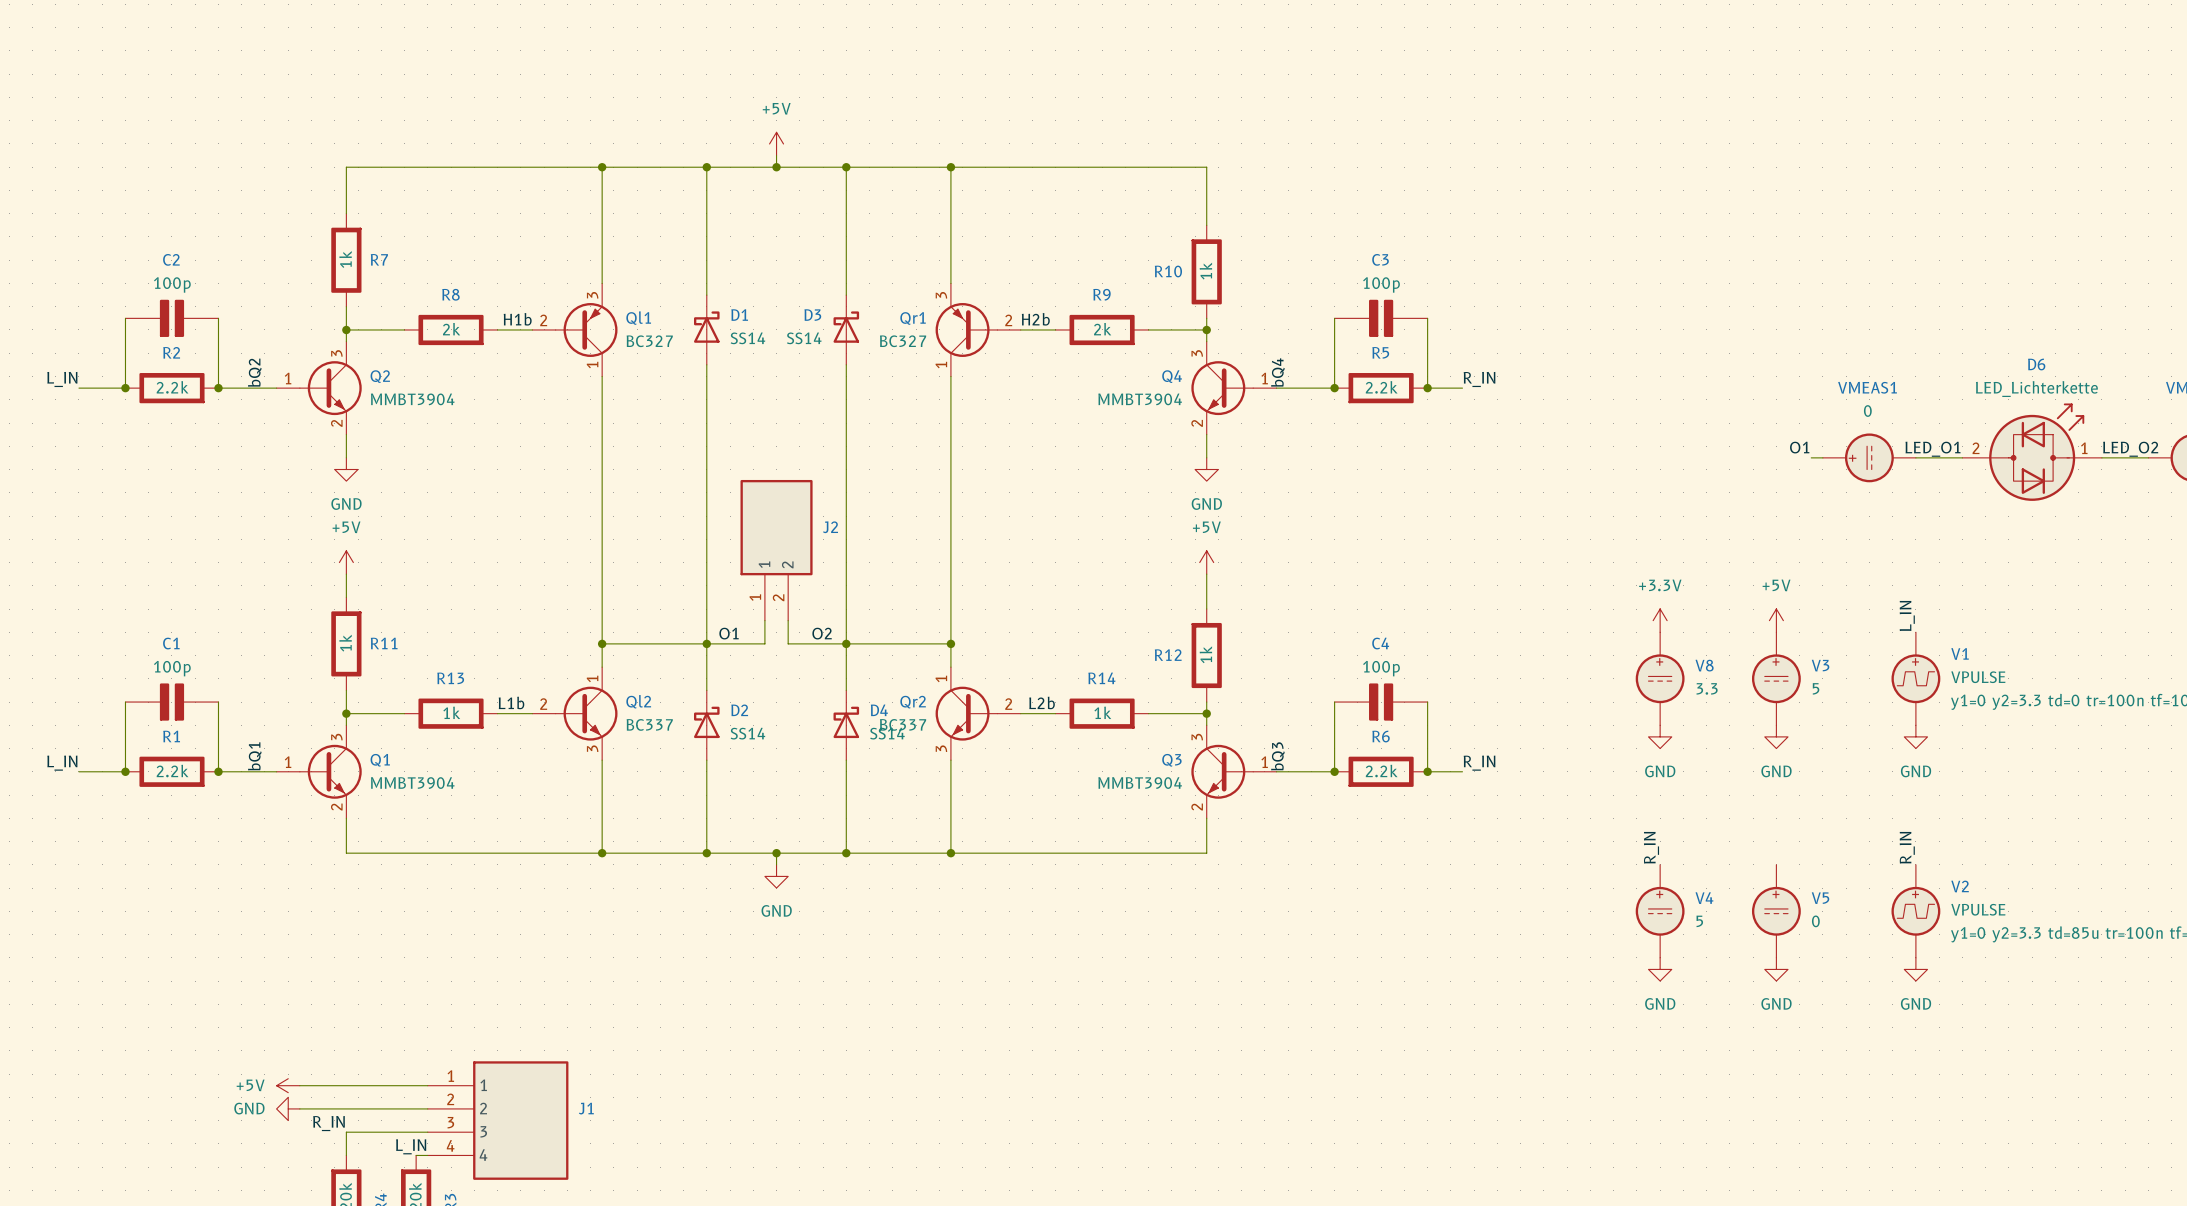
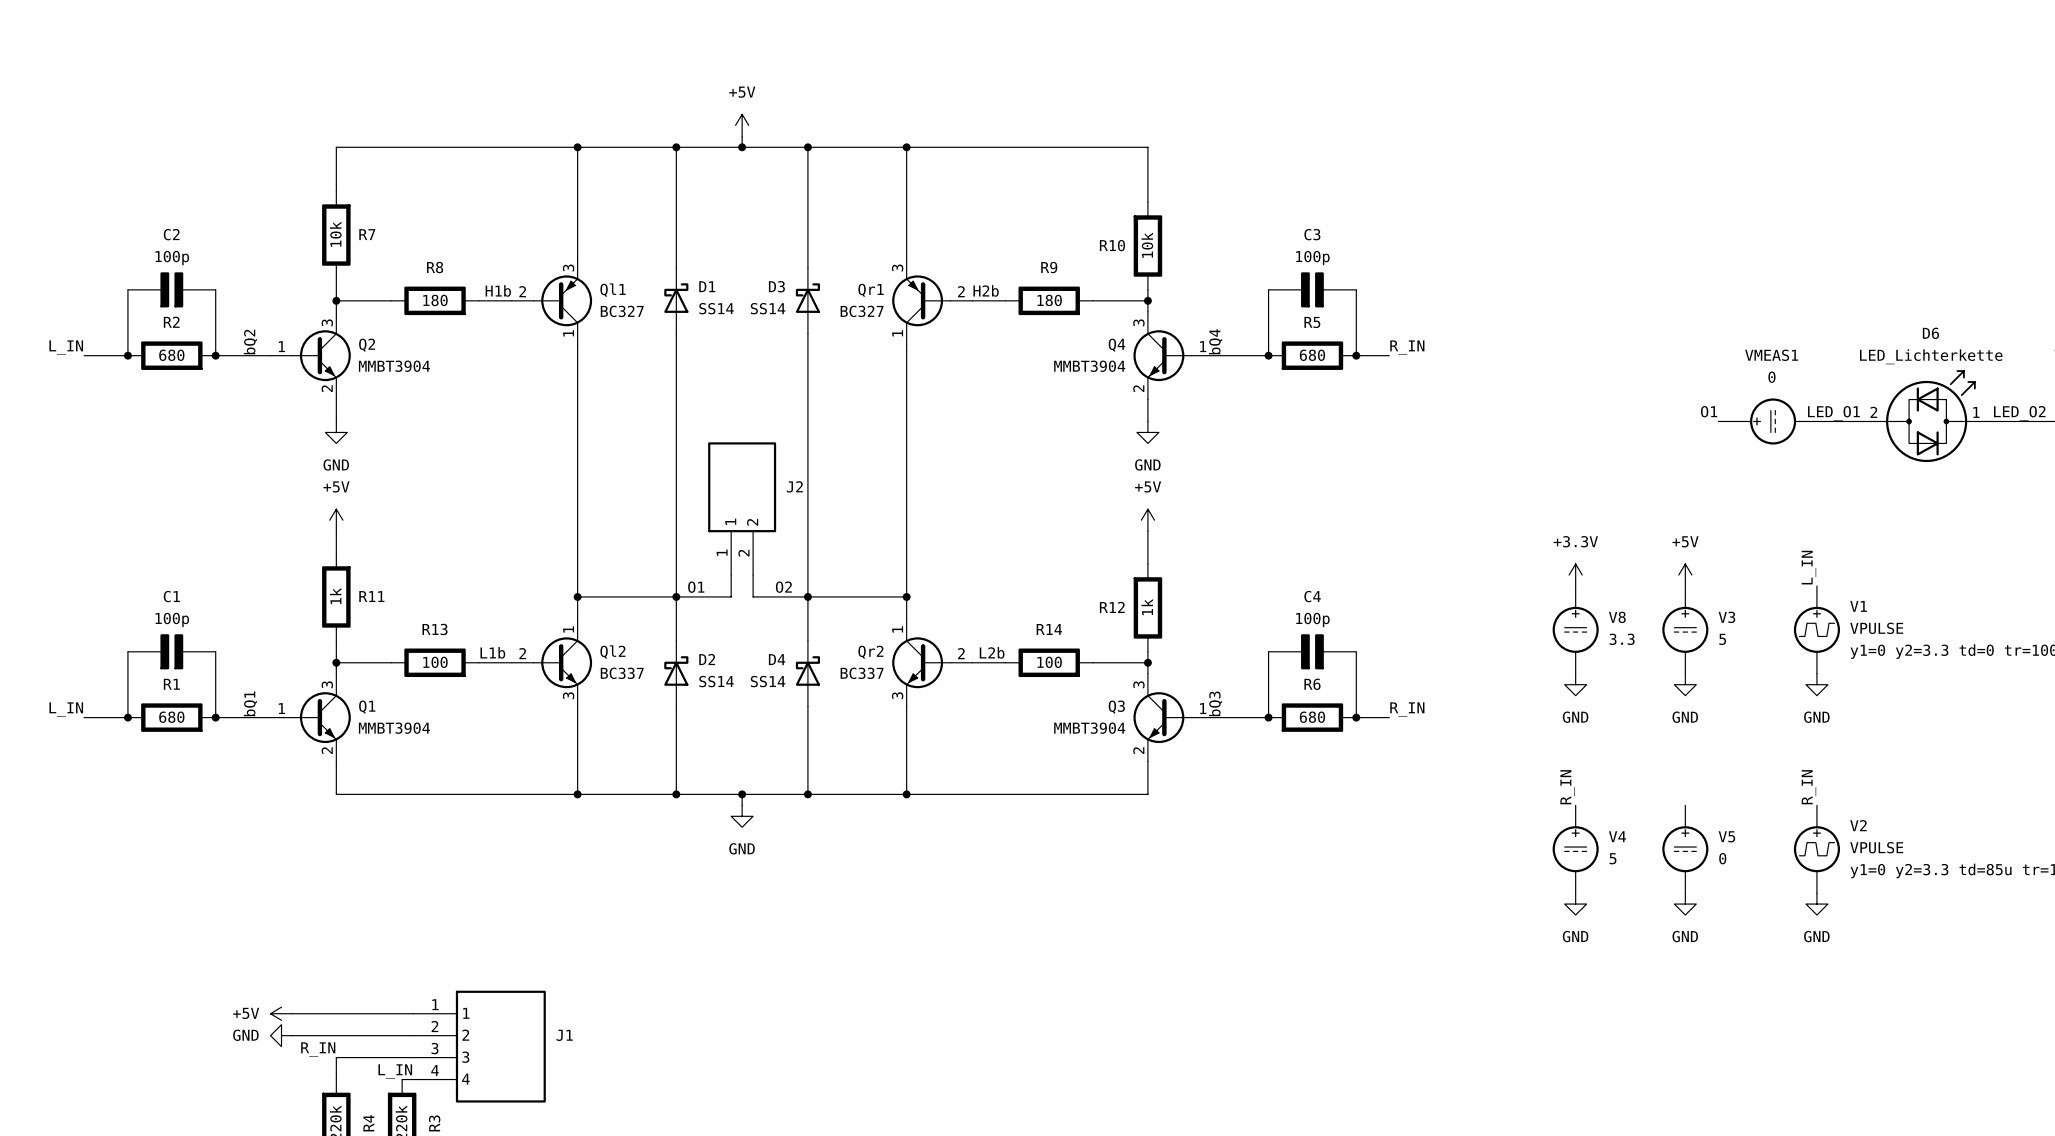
R7 value: 1k (345, 259) -> 10k (335, 234)
R10 value: 1k (1205, 271) -> 10k (1147, 245)
R8 value: 2k (451, 329) -> 180 (435, 300)
R9 value: 2k (1102, 329) -> 180 (1049, 300)
R2 value: 2.2k (172, 387) -> 680 (171, 355)
R5 value: 2.2k (1381, 387) -> 680 (1312, 355)
D4 name position: D4 (879, 710) -> D4 (777, 659)
R13 value: 1k (451, 712) -> 100 (435, 662)
R14 value: 1k (1102, 712) -> 100 (1049, 662)
D4 value position: SS14 (887, 733) -> SS14 (768, 681)
R1 value: 2.2k (172, 771) -> 680 (171, 717)
R6 value: 2.2k (1381, 771) -> 680 (1312, 717)

